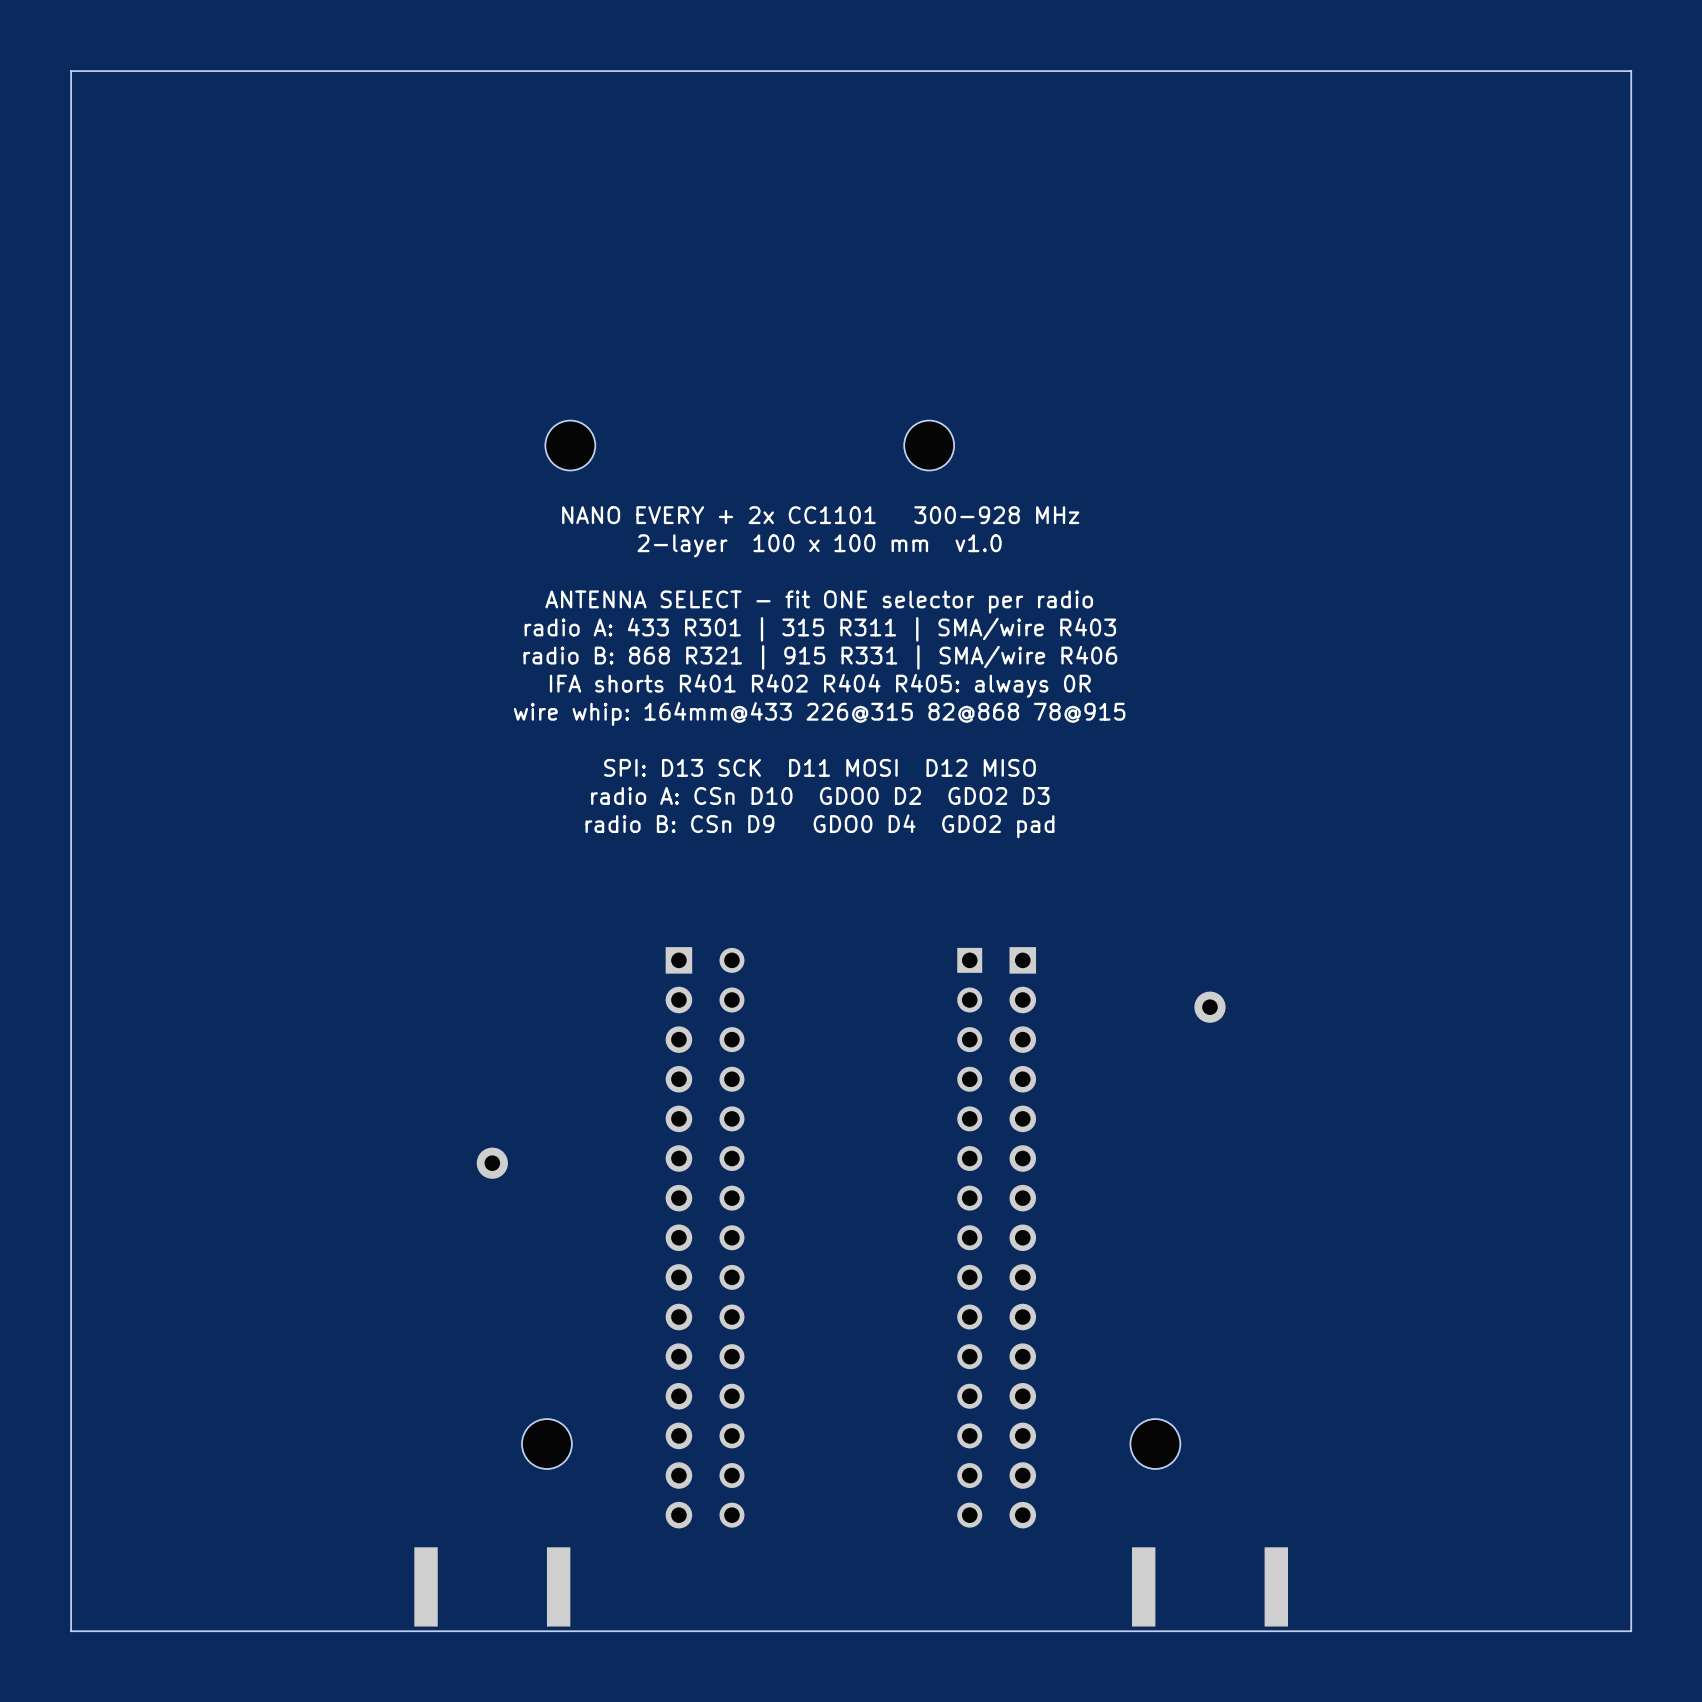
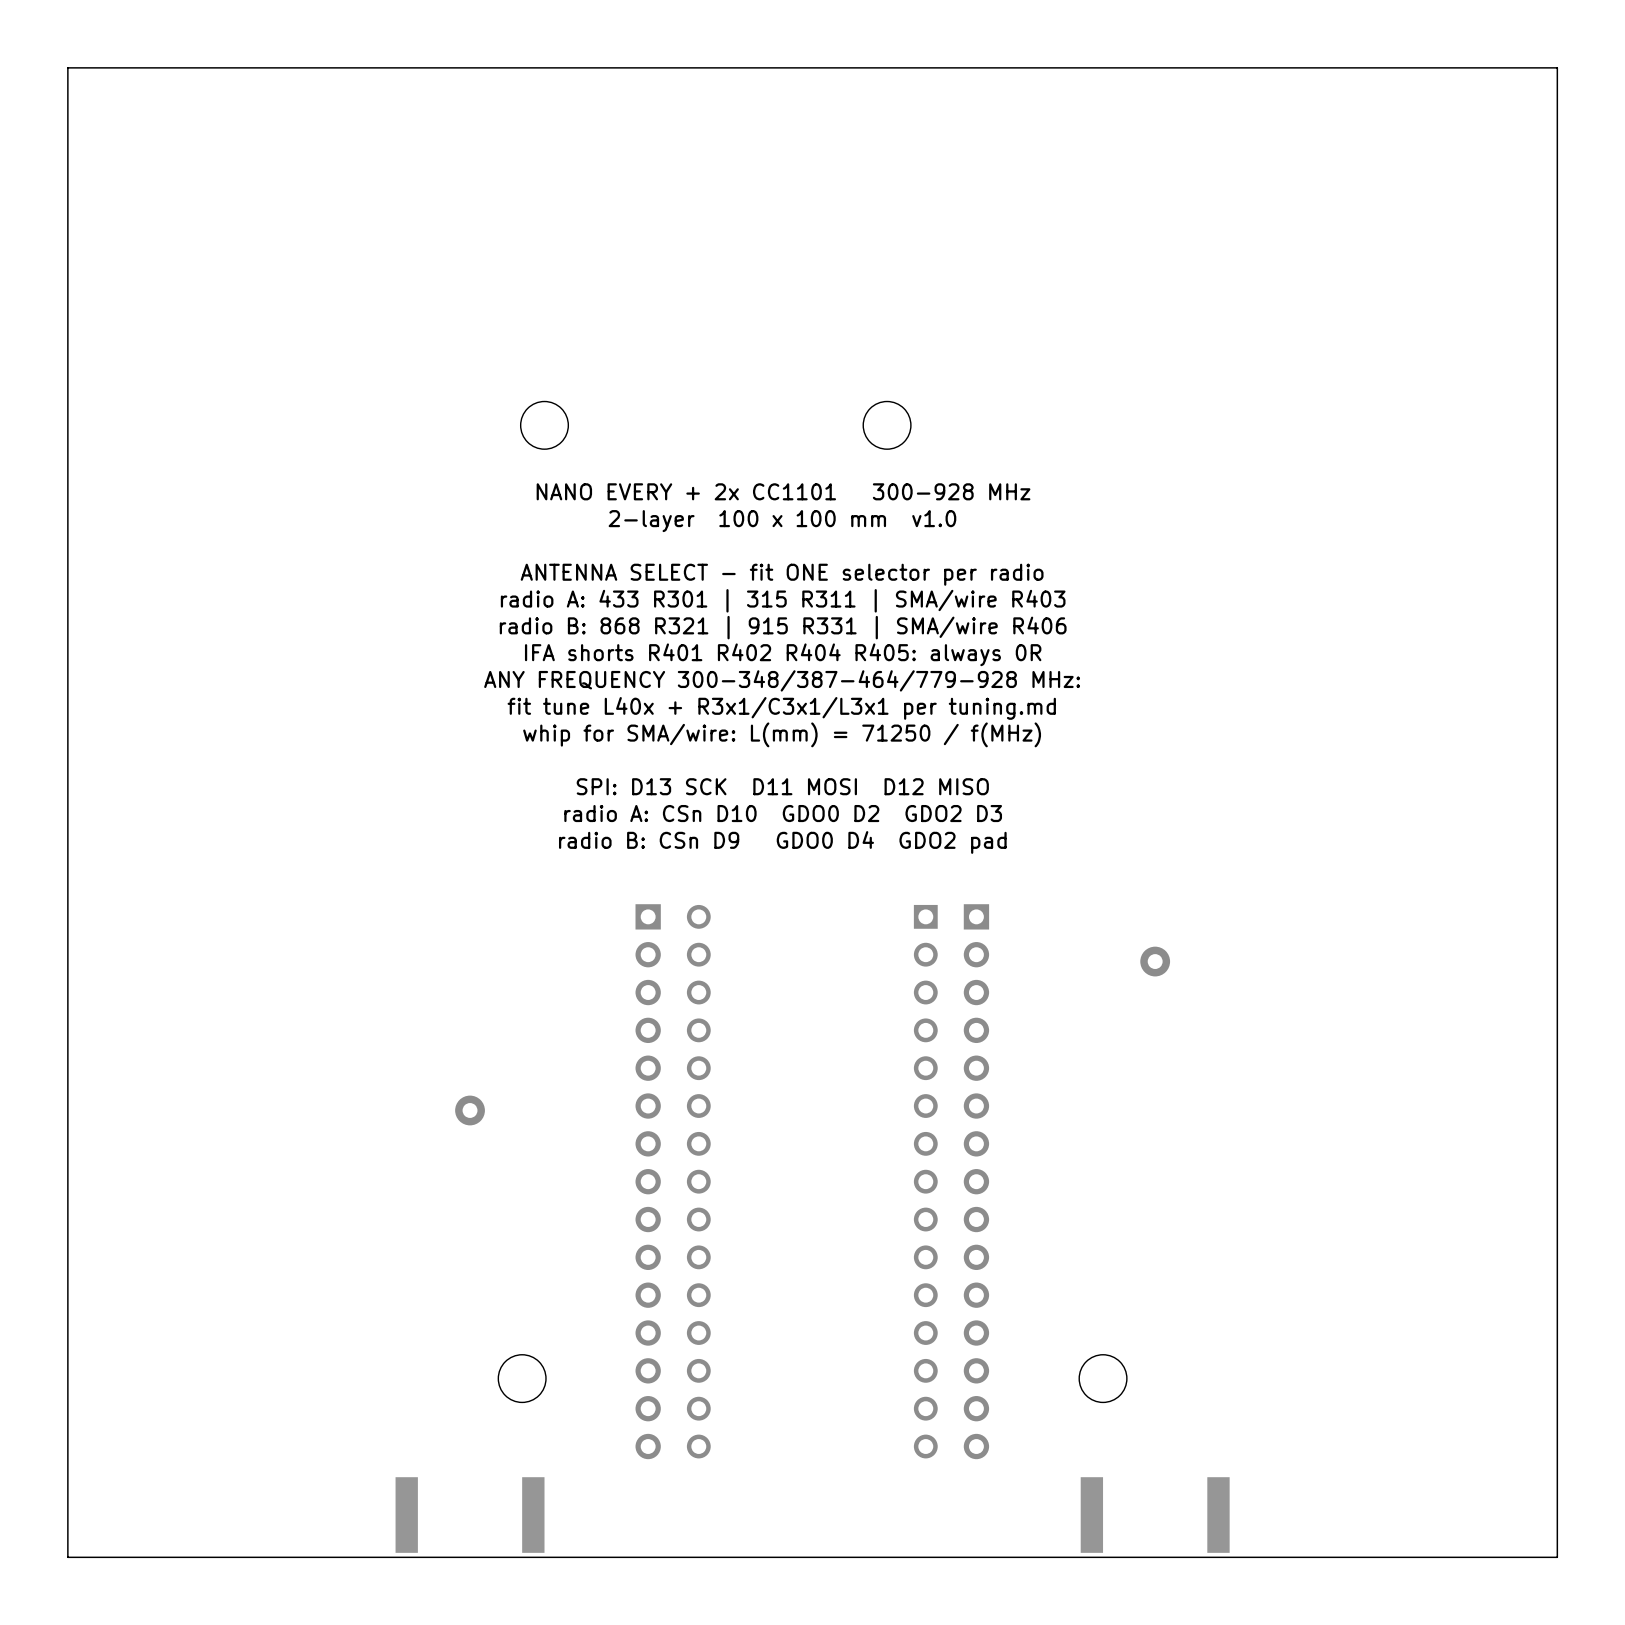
text: wire whip: 164mm@433 226@315 82@868 78@915 (819, 713) -> ANY FREQUENCY 300-348/387-464/779-928 MHz: (782, 680)
text: none -> fit tune L40x + R3x1/C3x1/L3x1 per tuning.md (781, 708)
text: SPI: D13 SCK D11 MOSI D12 MISO (819, 767) -> whip for SMA/wire: L(mm) = 71250 / f(MHz) (782, 734)
text position: radio A: CSn D10 GDO0 D2 GDO2 D3 (820, 795) -> radio A: CSn D10 GDO0 D2 GDO2 D3 (783, 813)
text: radio B: CSn D9 GDO0 D4 GDO2 pad (819, 826) -> SPI: D13 SCK D11 MOSI D12 MISO (782, 786)
text: none -> radio B: CSn D9 GDO0 D4 GDO2 pad (782, 842)

